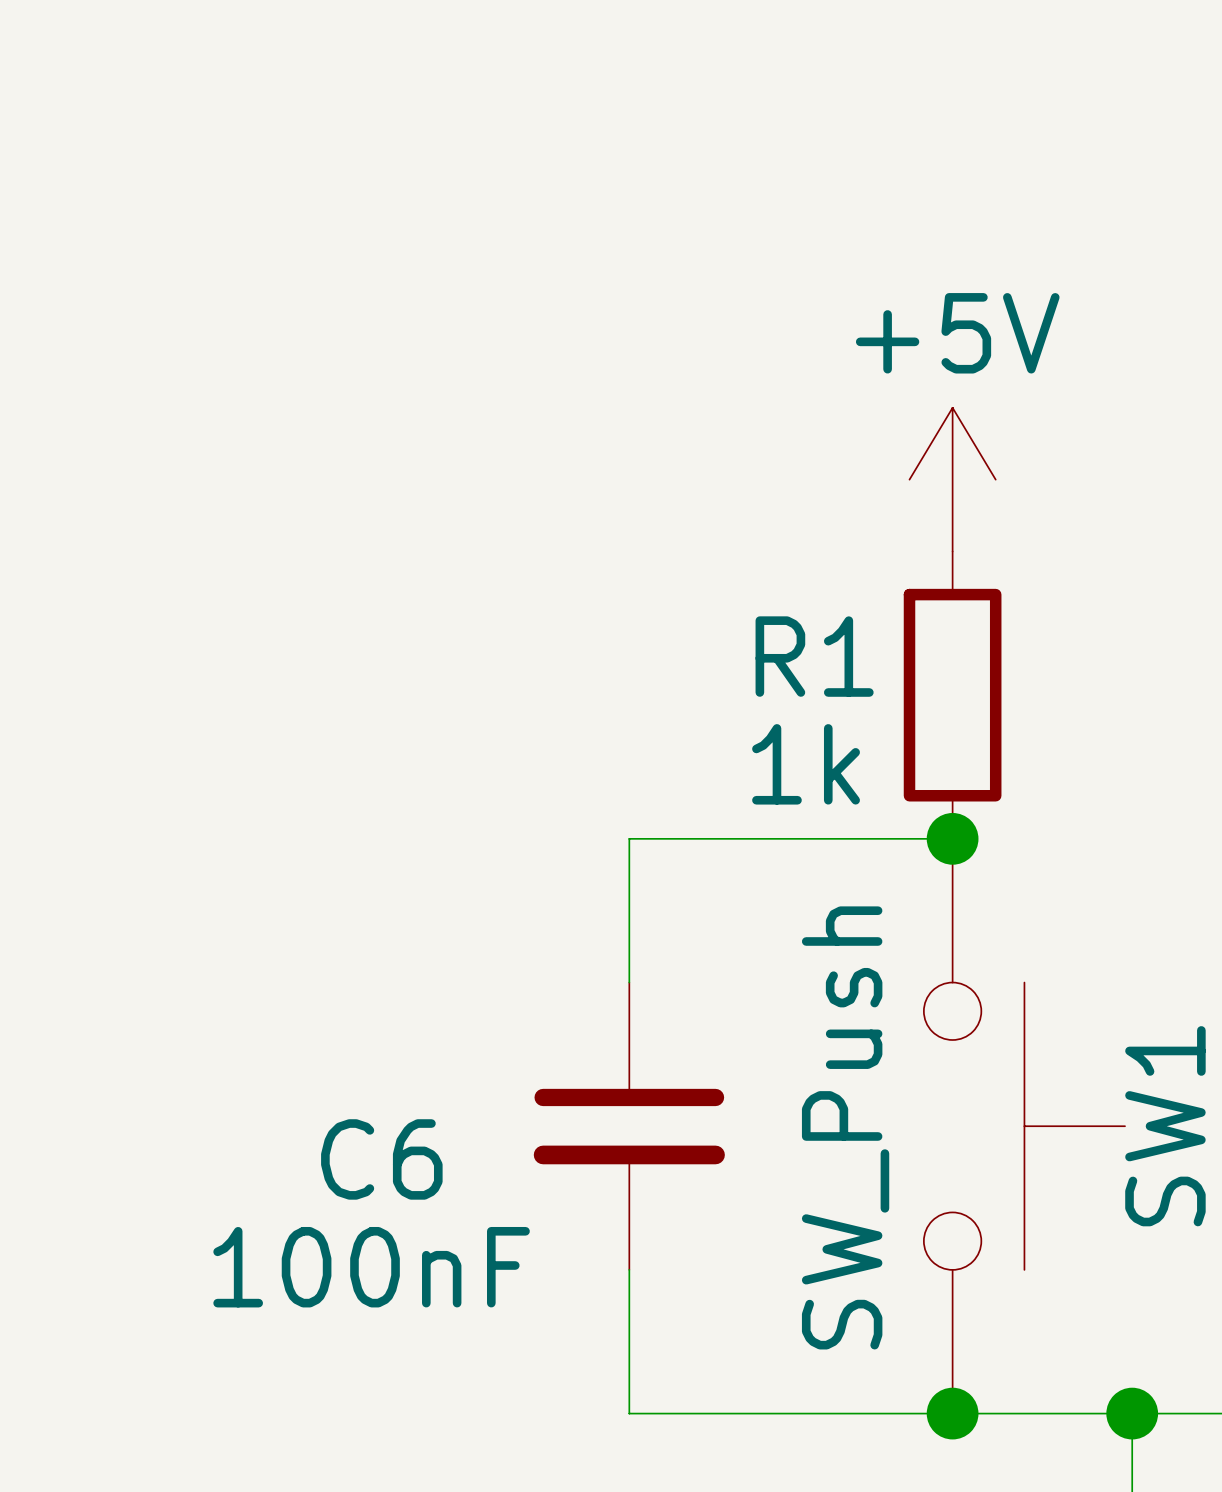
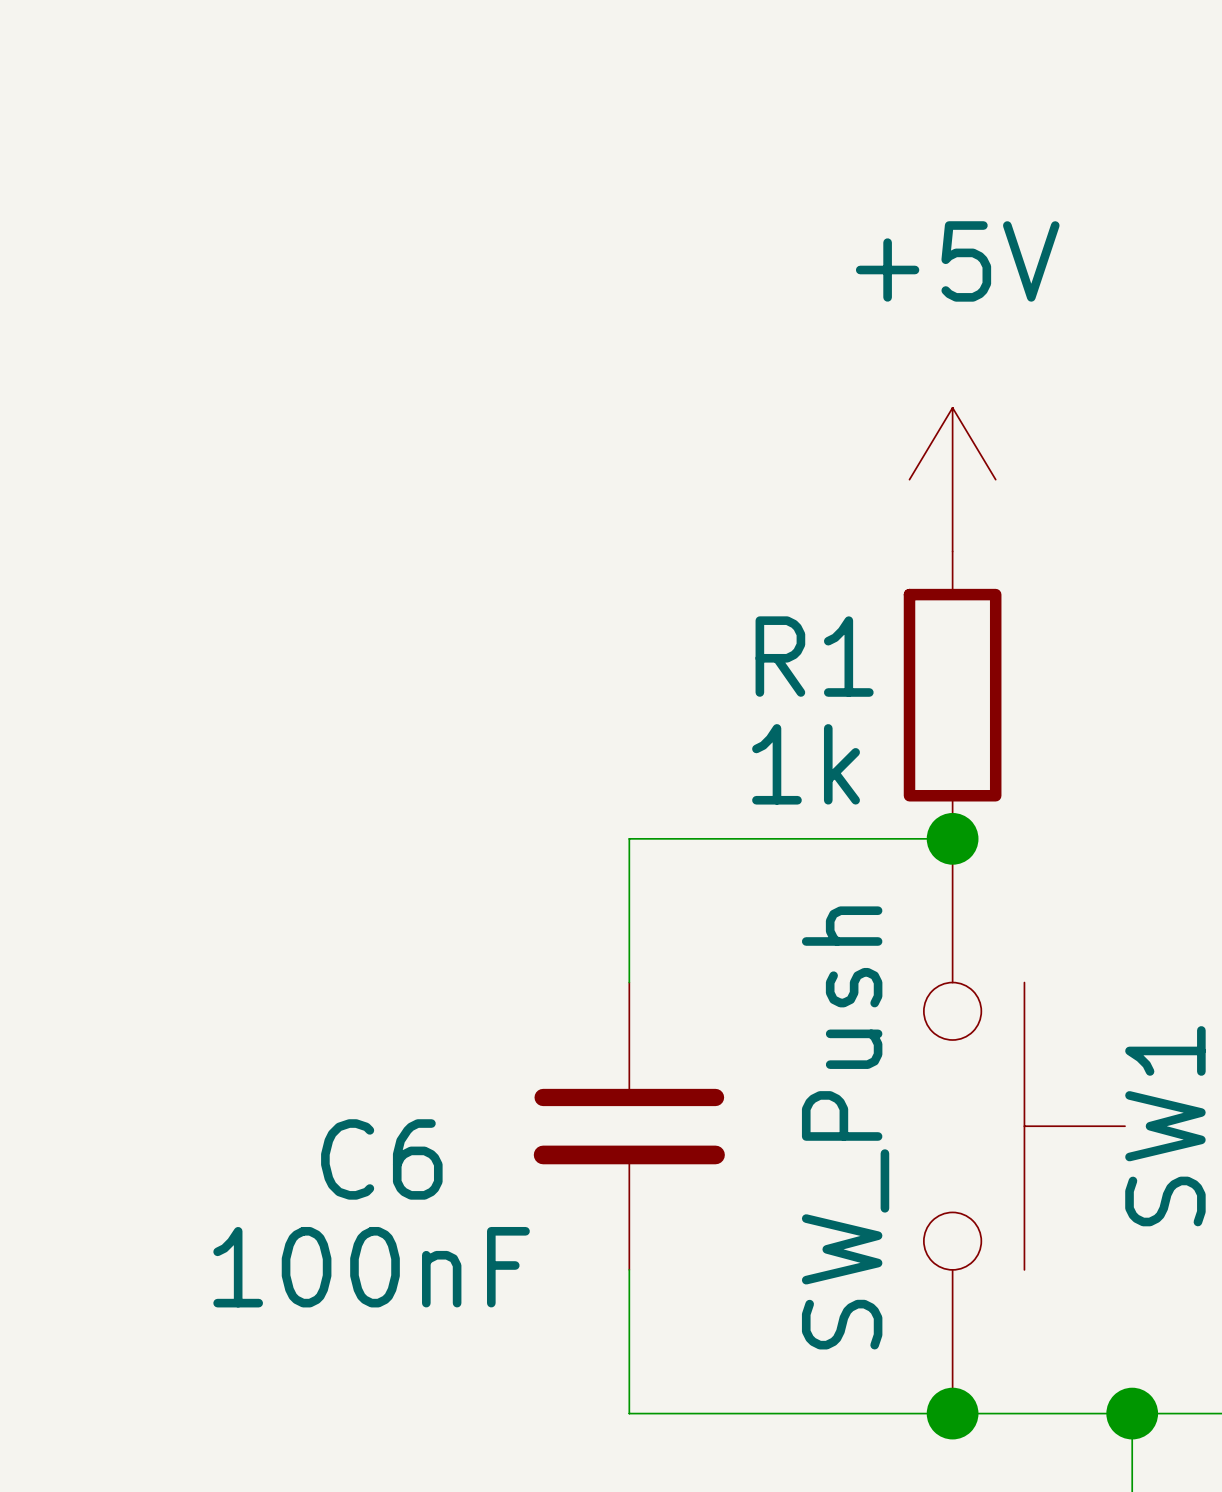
power symbol text position: +5V (957, 333) -> +5V (957, 261)

